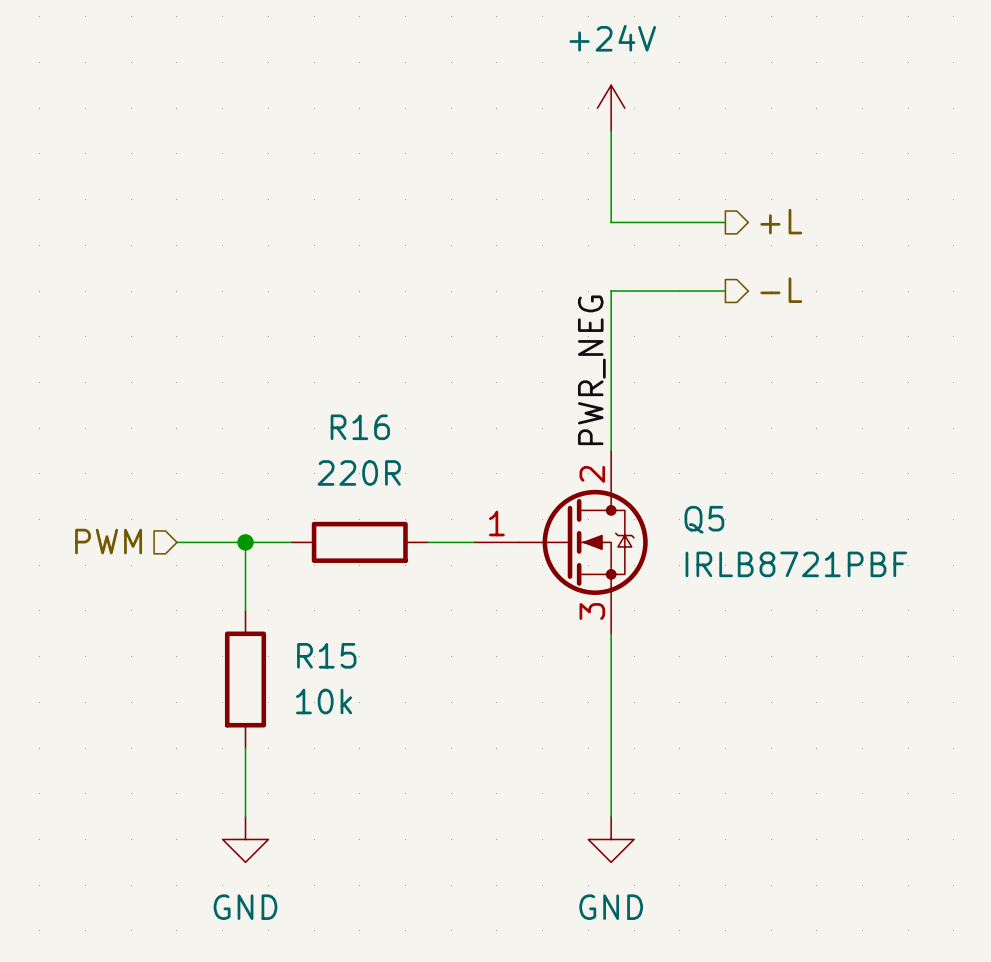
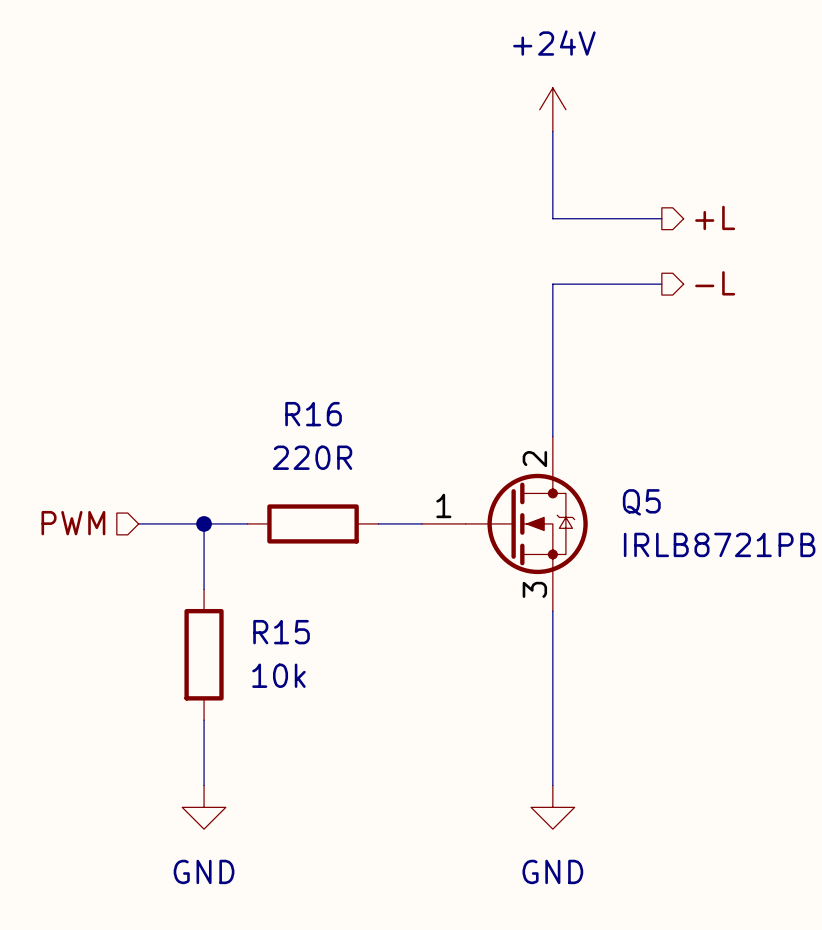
label: PWR_NEG (591, 370) -> none

